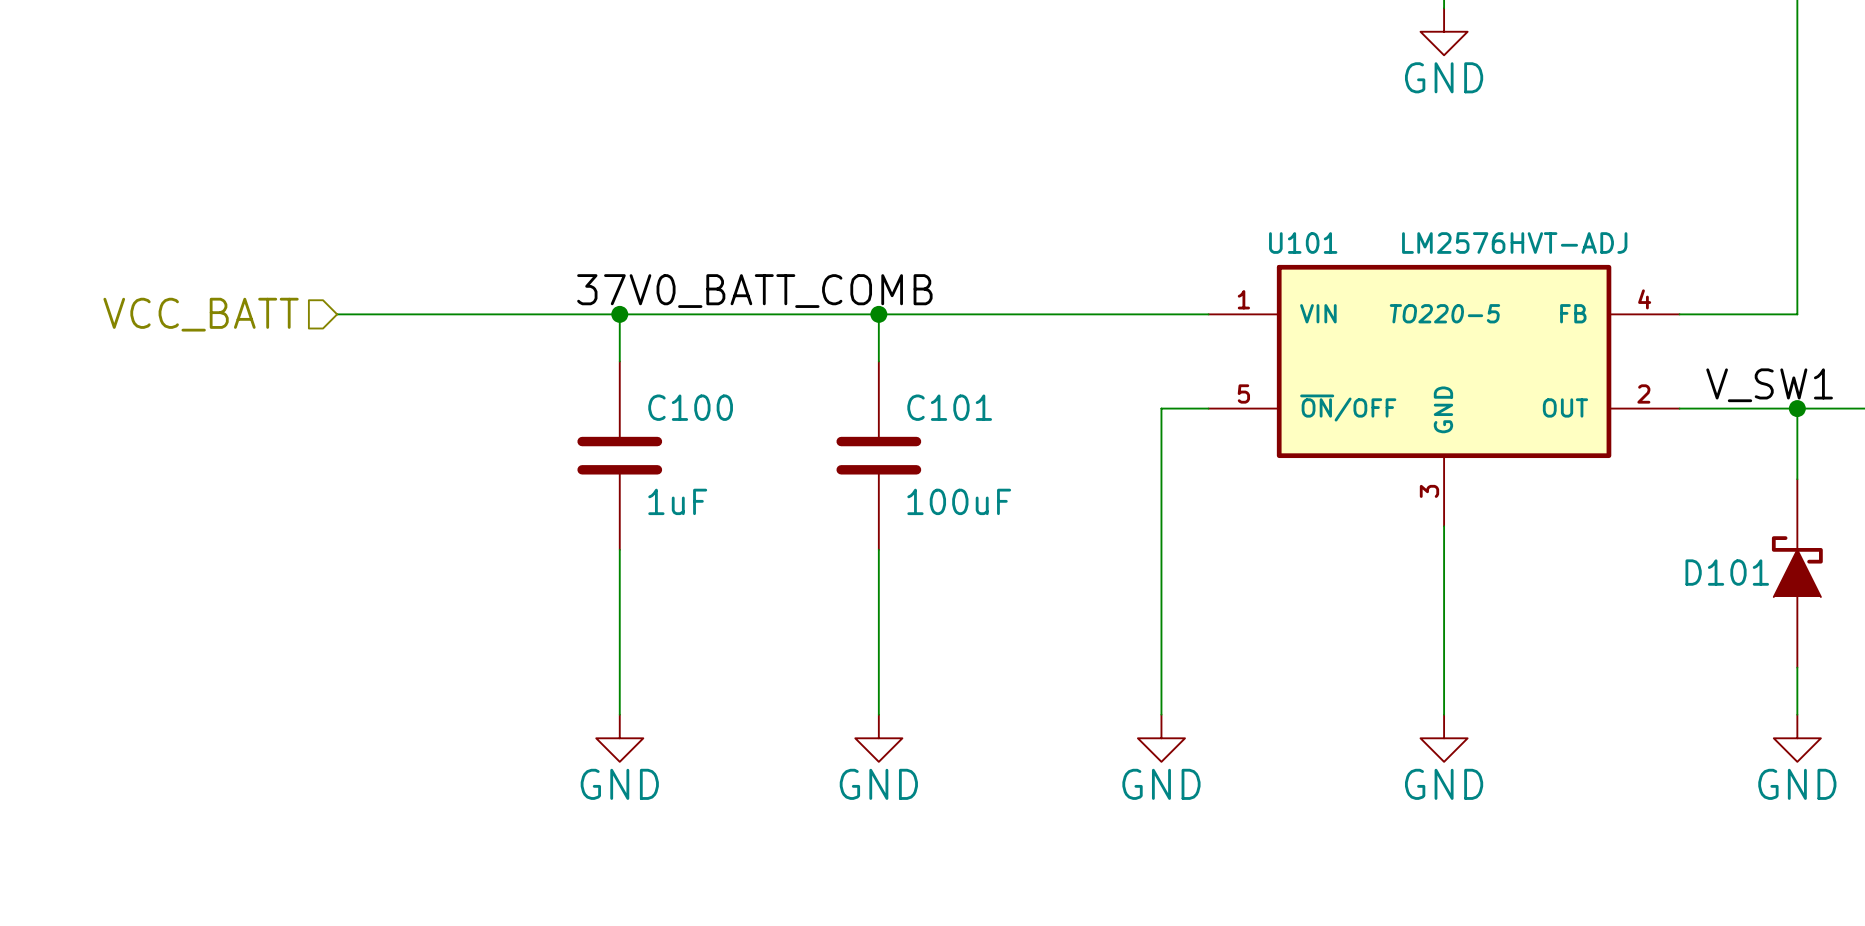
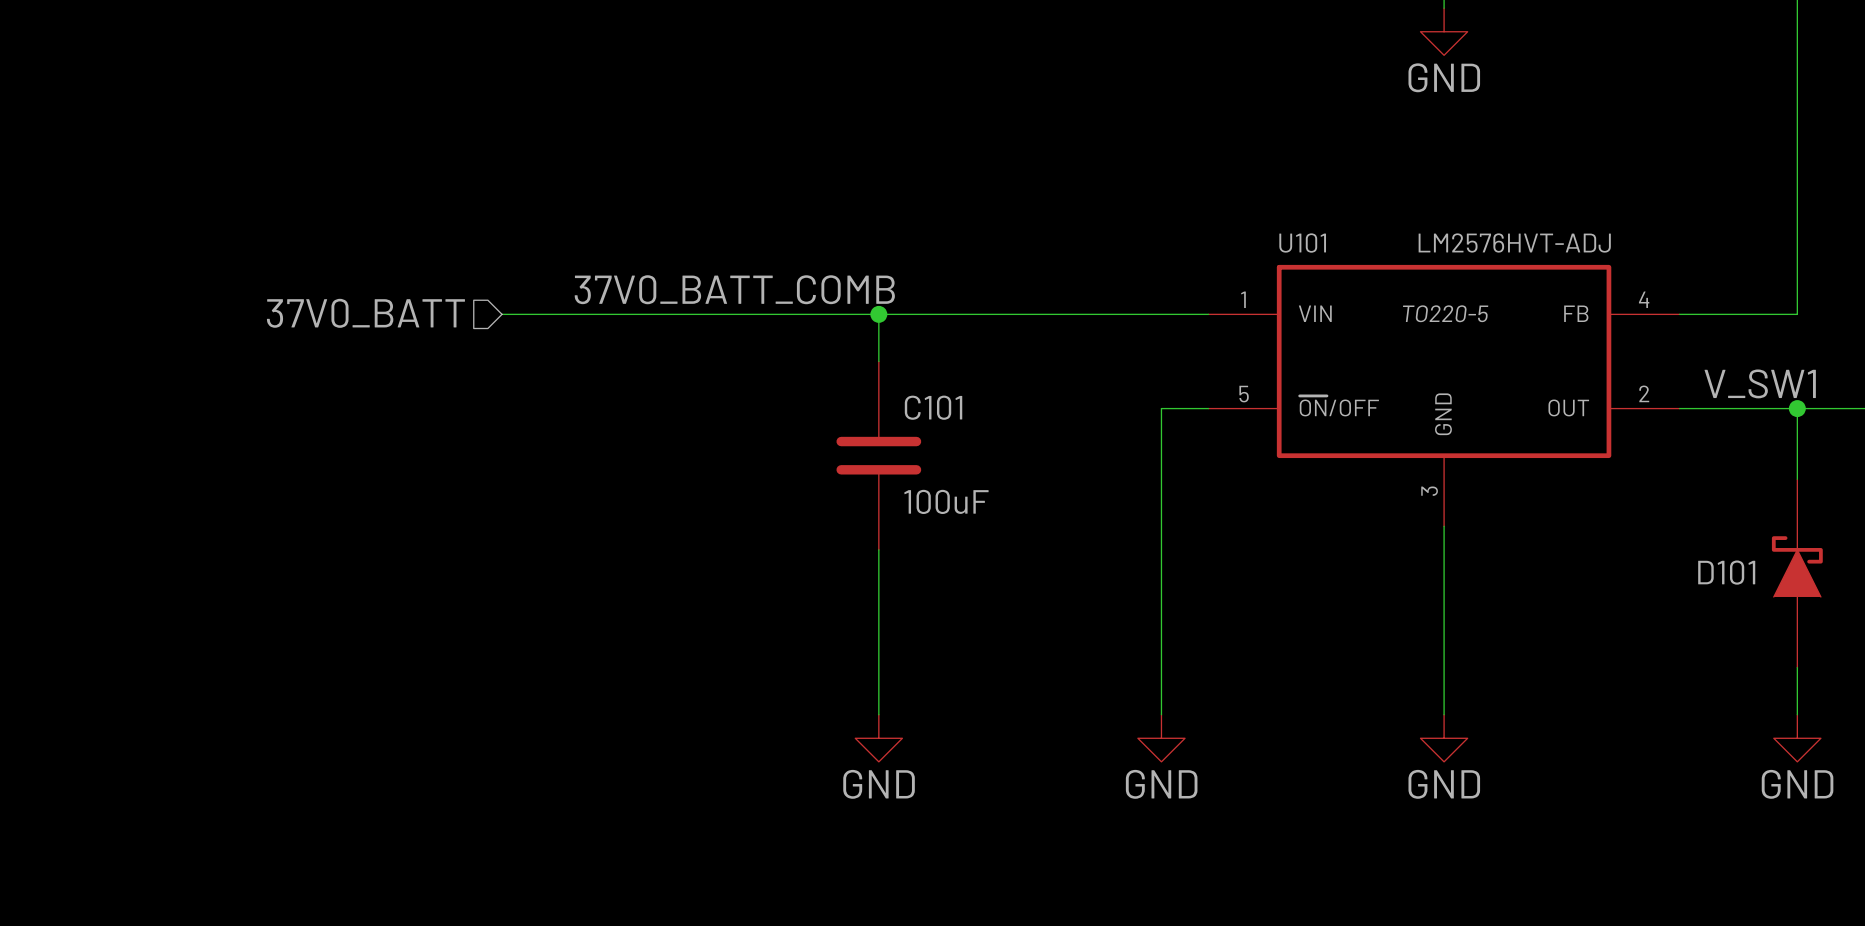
hierarchical label: VCC_BATT (201, 314) -> 37V0_BATT (365, 313)
wire: (337, 314) (502, 314) -> none
wire: (619, 314) (619, 361) -> none
junction: (619, 314) -> none
C100: 1uF (619, 455) -> none
wire: (619, 549) (619, 714) -> none
power symbol: GND (619, 738) -> none

